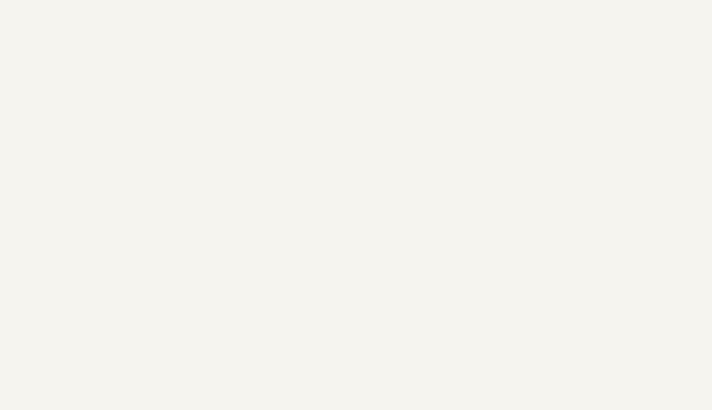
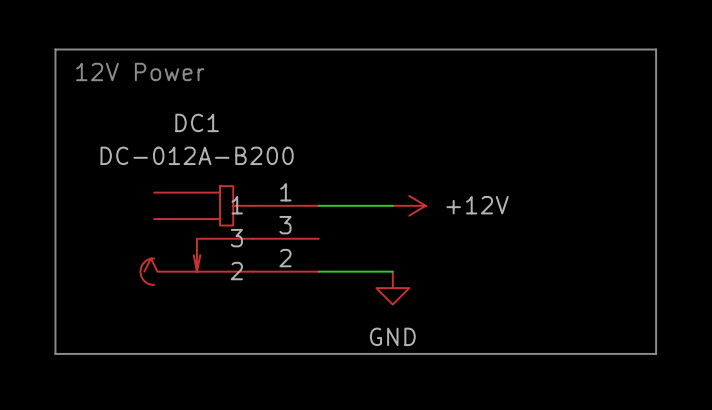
line: none -> (55, 49) (656, 49) (656, 353) (55, 353) (55, 49)
text: none -> 12V Power (140, 71)
wire: none -> (318, 205) (392, 205)
power symbol: none -> +12V (409, 205)
DC1: none -> DC-012A-B200 (229, 235)
wire: none -> (318, 271) (392, 271)
power symbol: none -> GND (392, 288)

